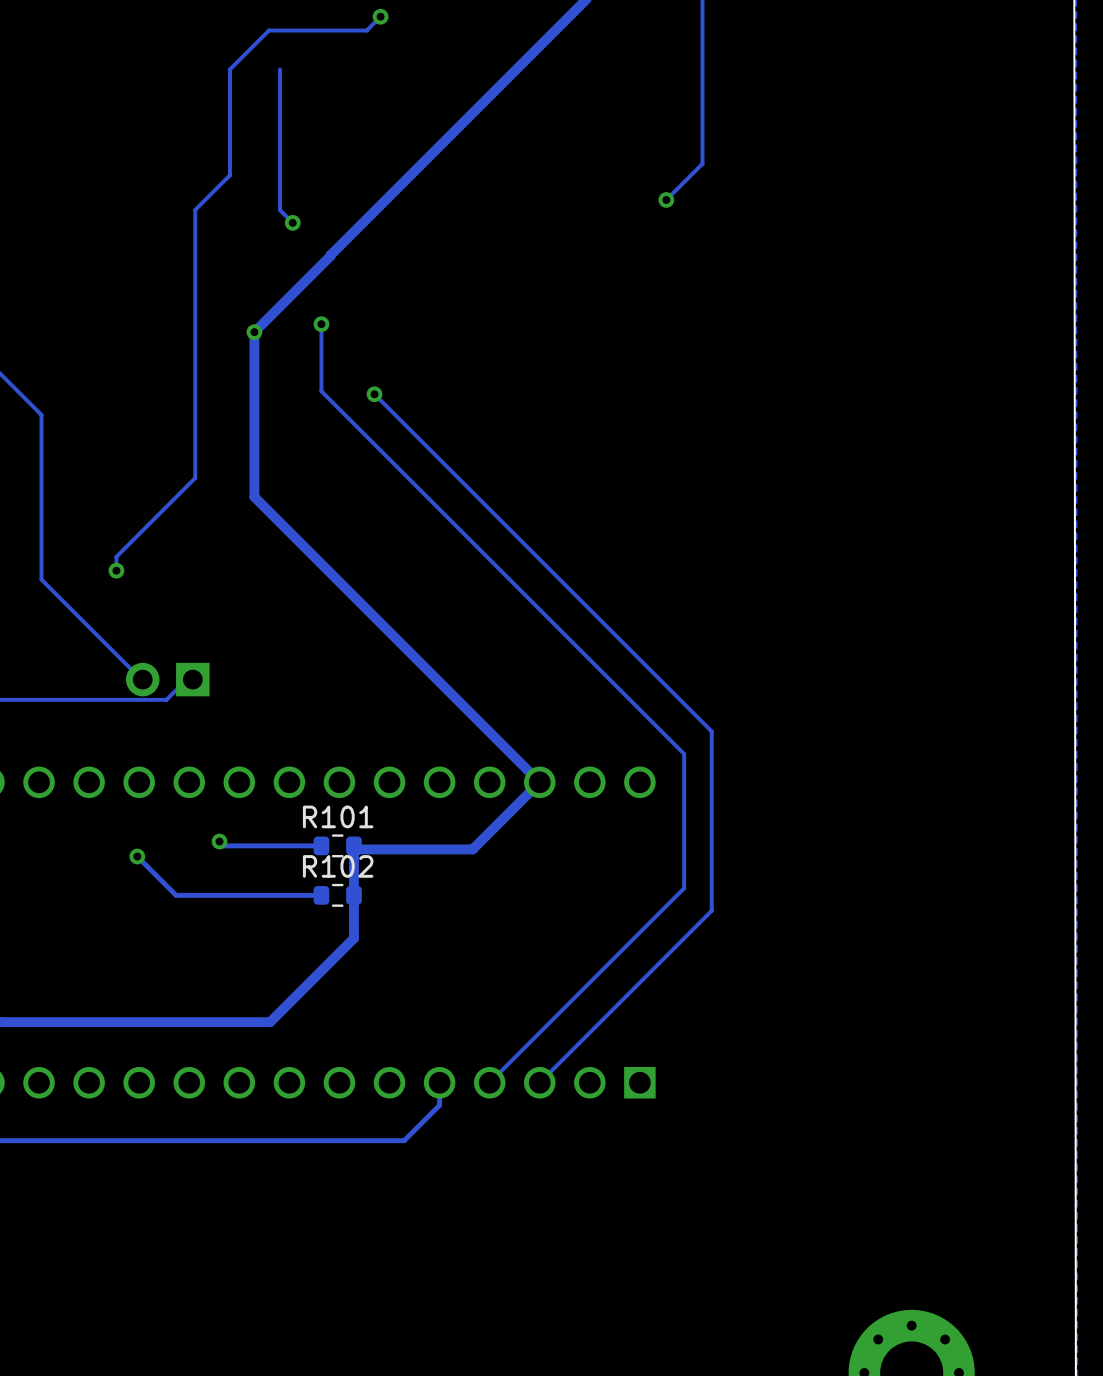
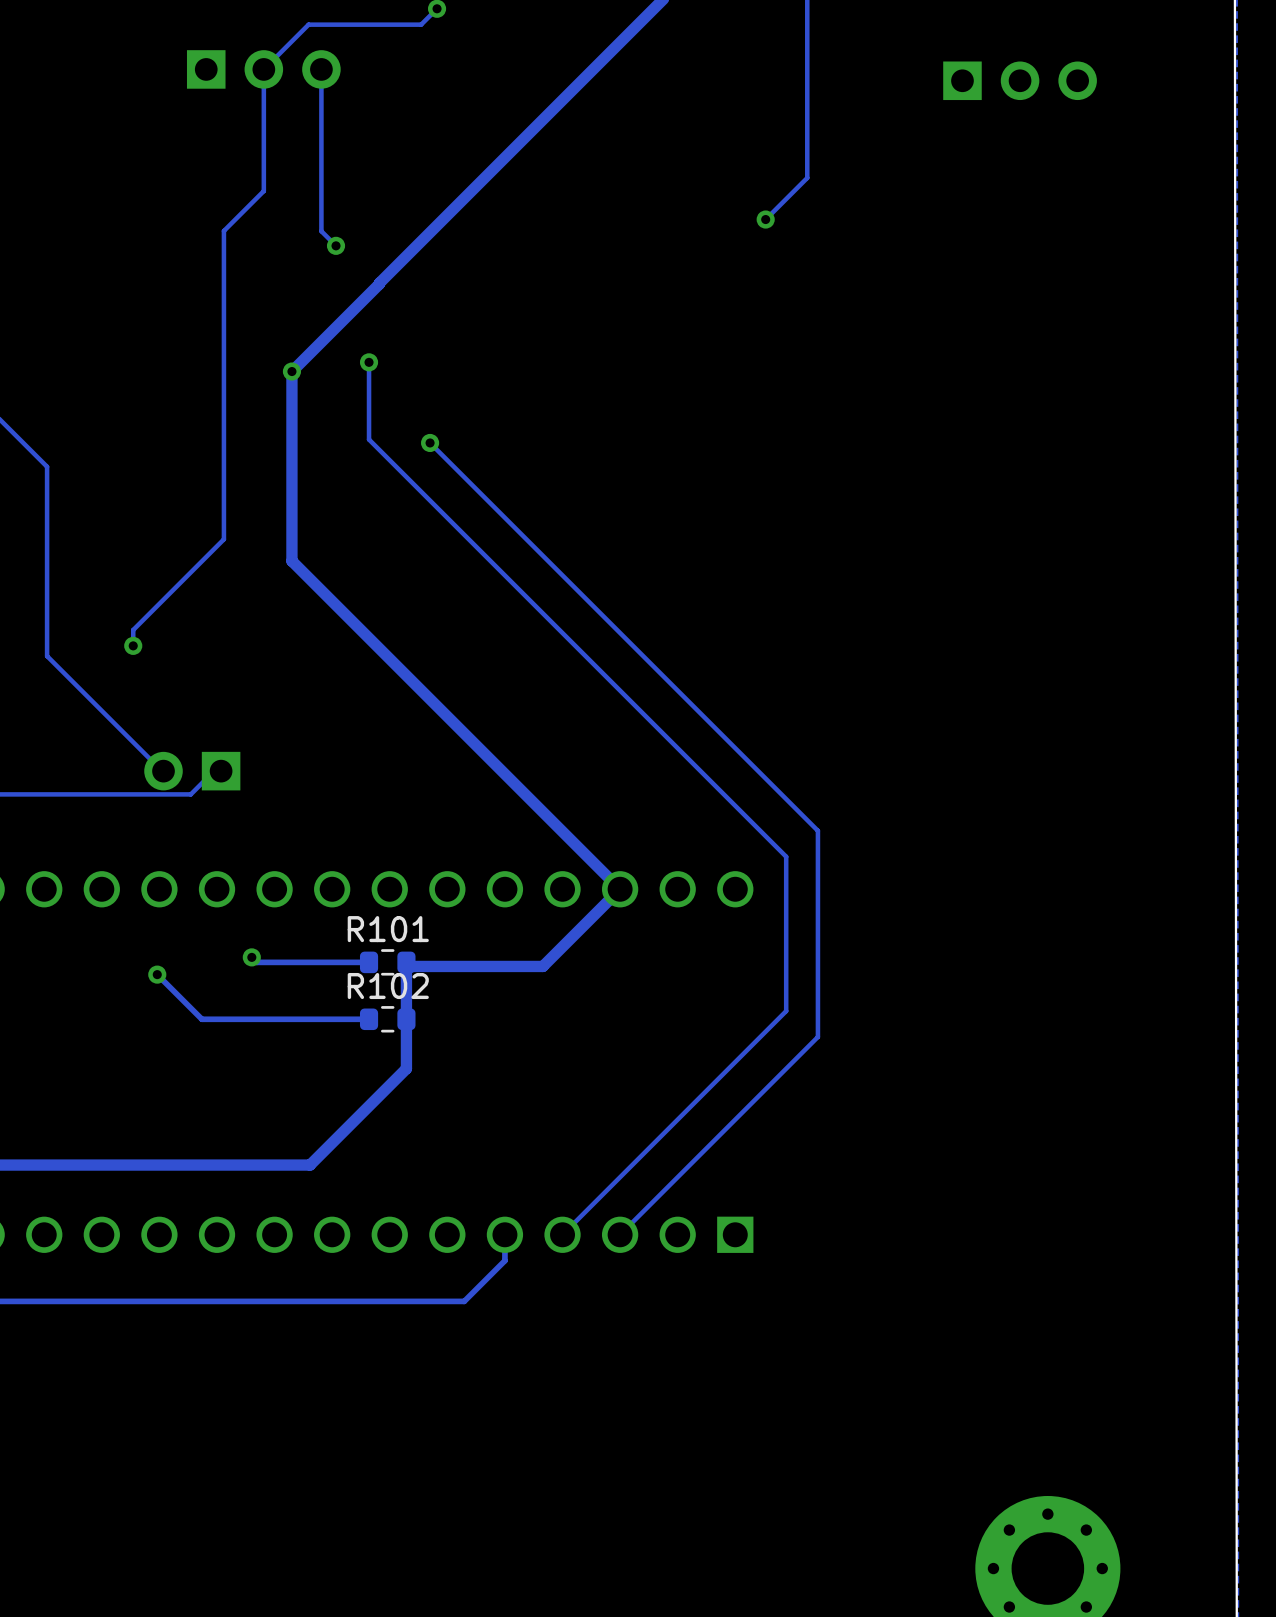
part: none -> (263, 69)
part: none -> (1020, 80)

